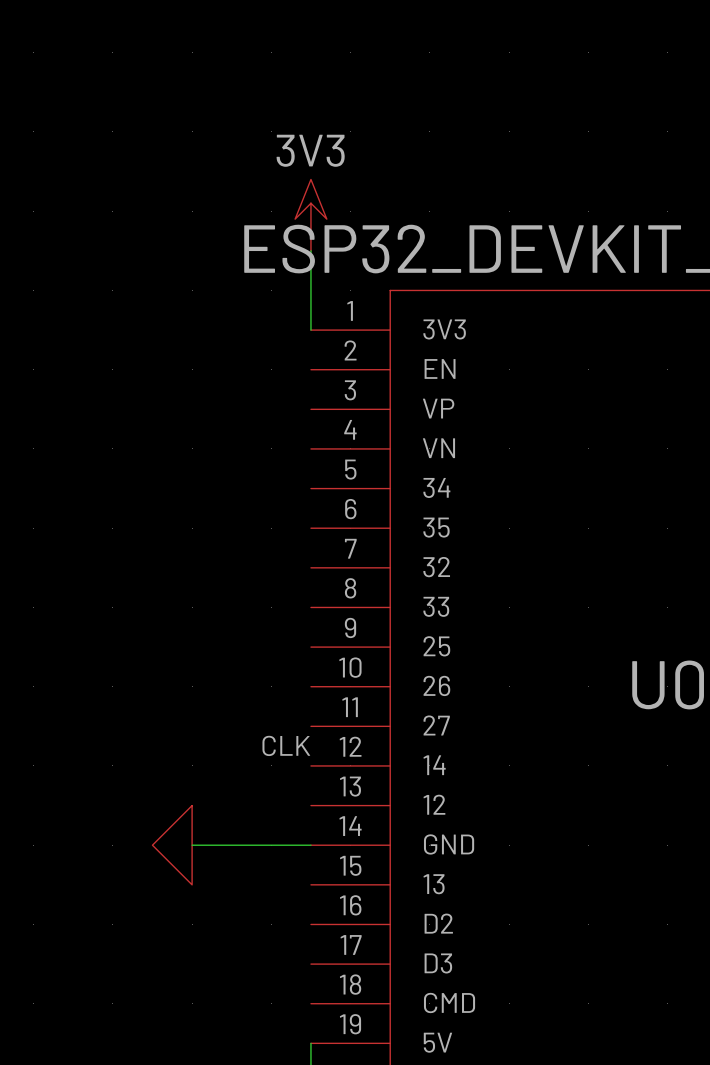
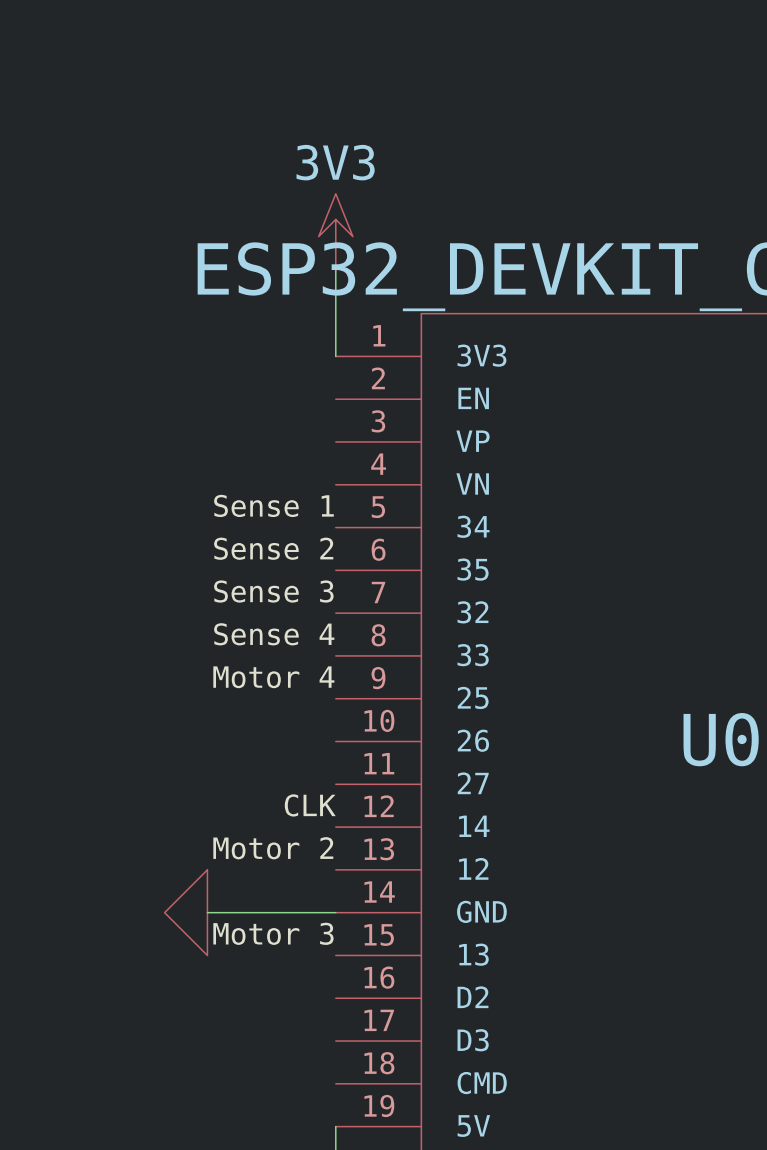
label: none -> Sense 1 (273, 505)
label: none -> Sense 2 (273, 548)
label: none -> Sense 3 (273, 591)
label: none -> Sense 4 (274, 634)
label: none -> Motor 4 (273, 677)
label: none -> Motor 2 (273, 848)
label: none -> Motor 3 (273, 933)

